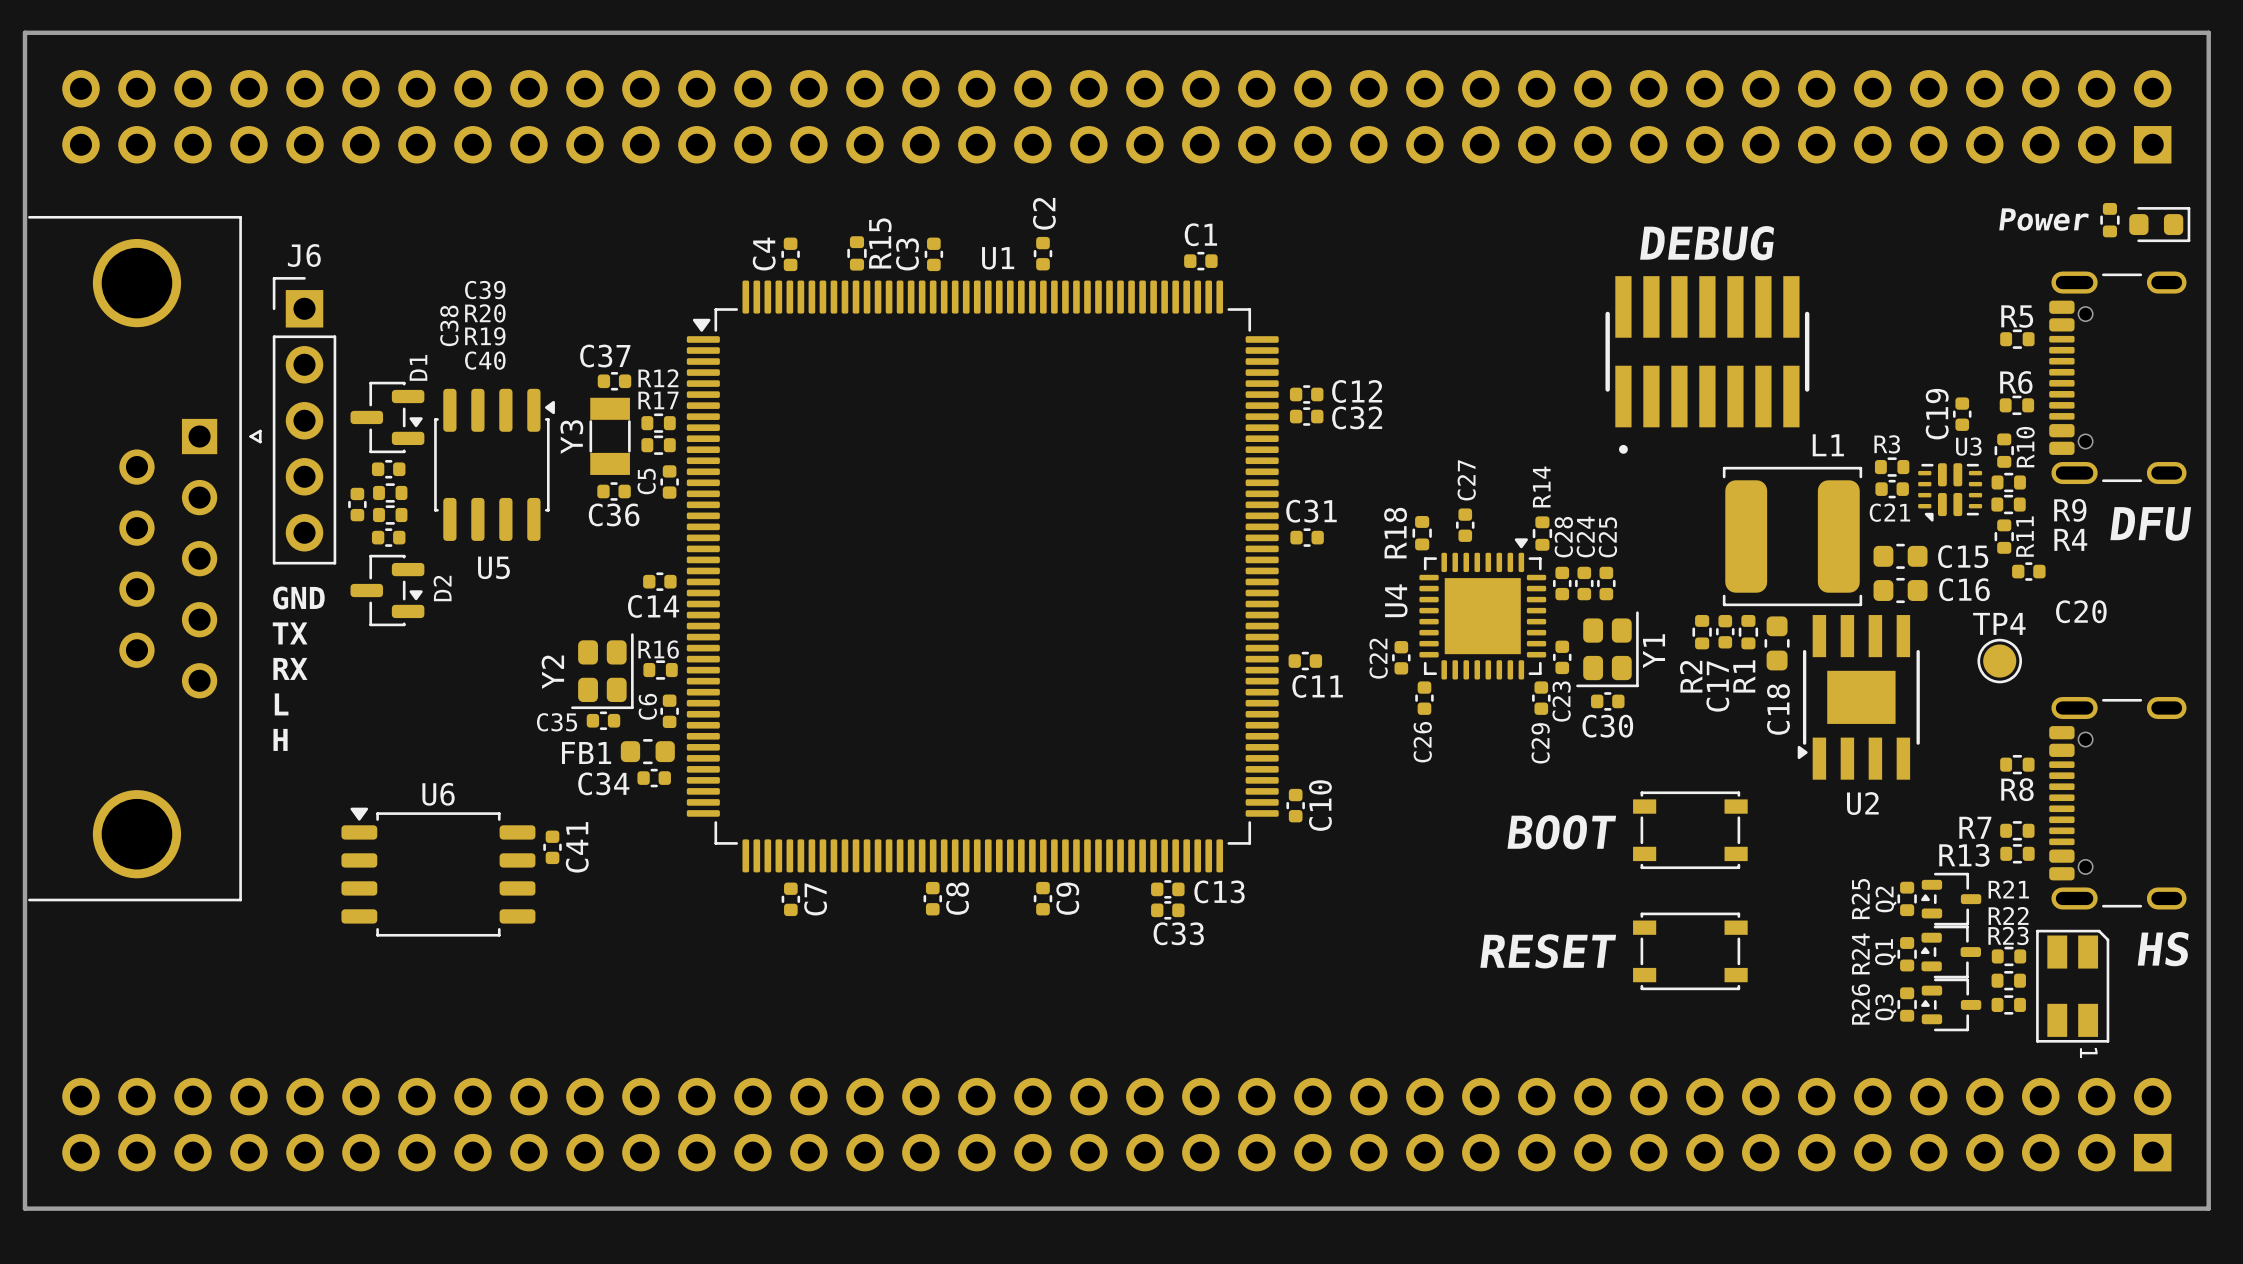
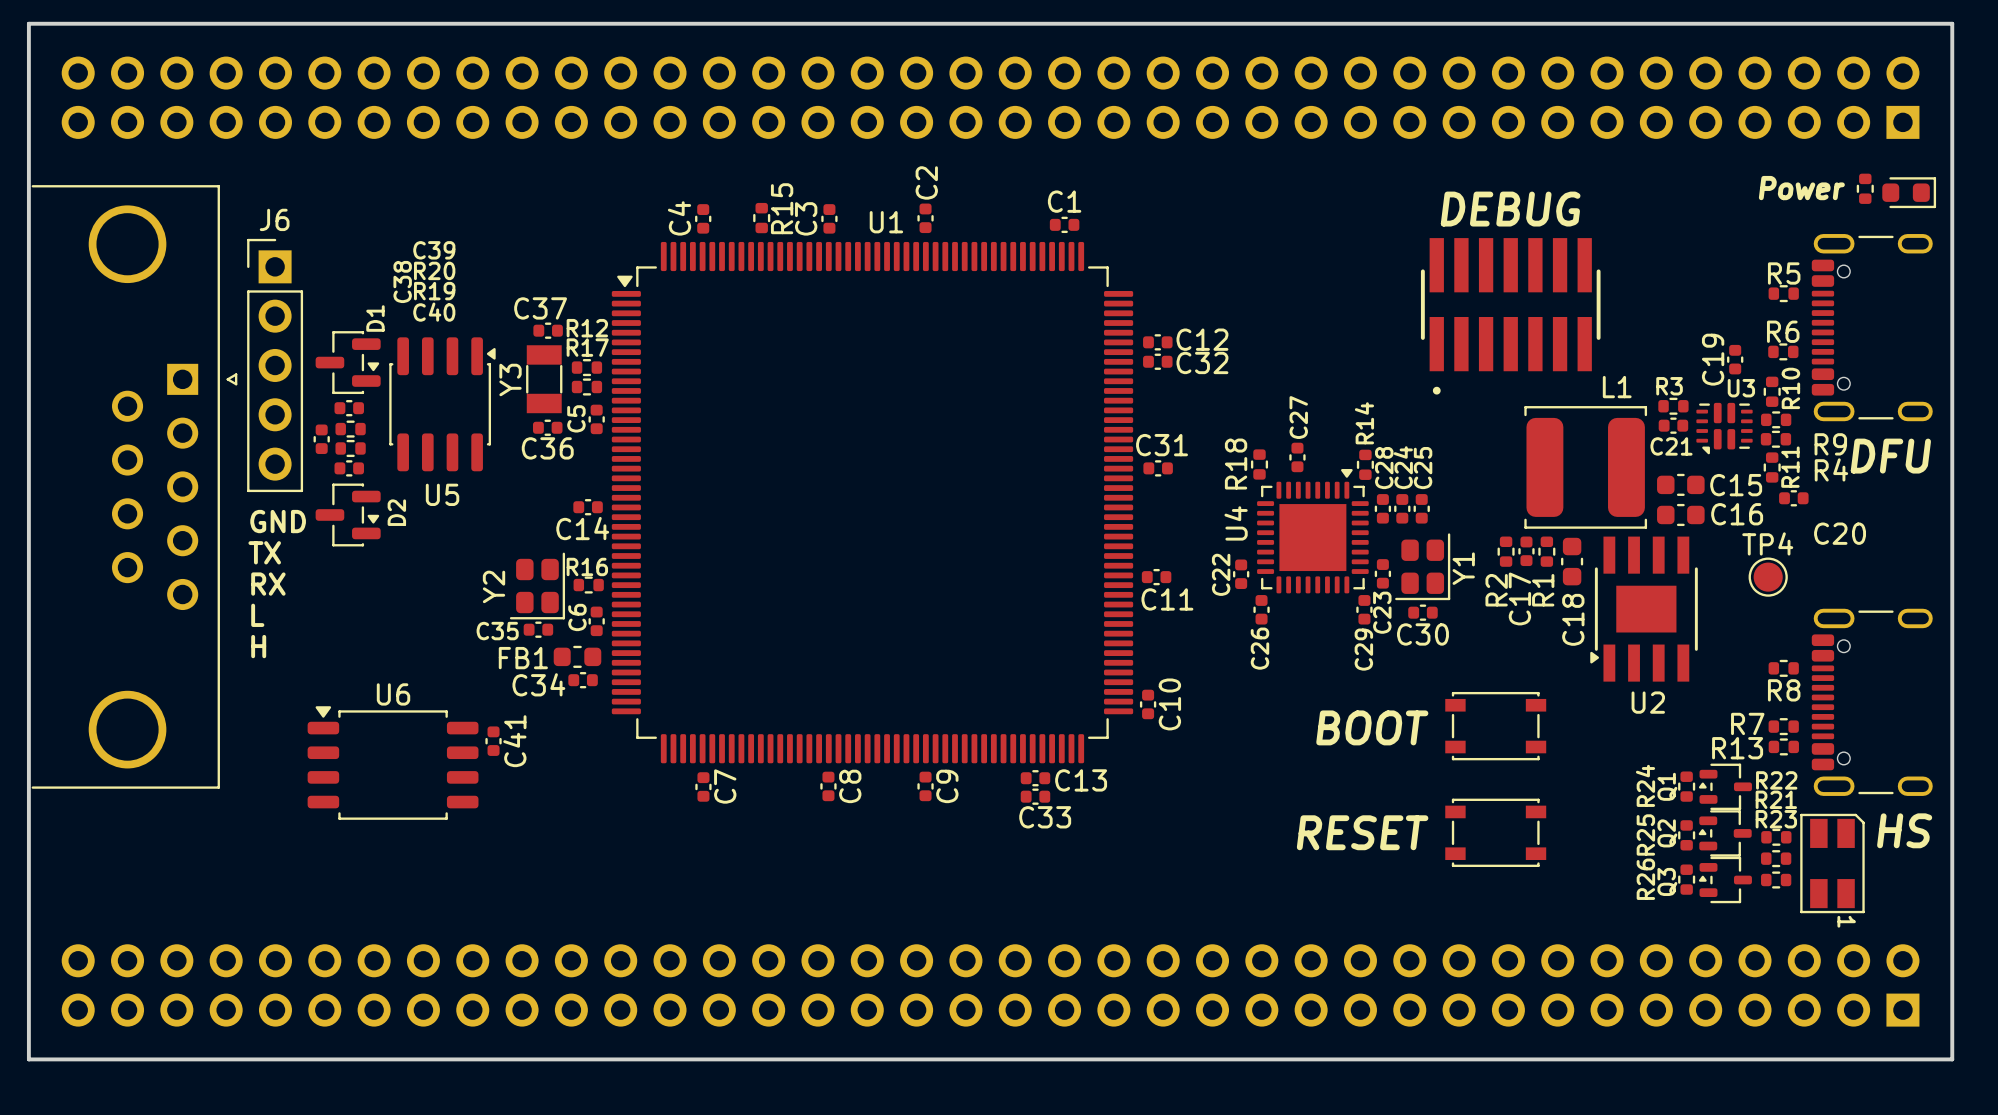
R21 name: R21 (2008, 889) -> R22 (1776, 780)
R25 name: R25 (1860, 899) -> R24 (1645, 785)
Q2 name: Q2 (1886, 899) -> Q1 (1667, 786)
R22 name: R22 (2008, 915) -> R21 (1776, 799)
Q1 name: Q1 (1885, 952) -> Q2 (1667, 833)
R24 name: R24 (1860, 953) -> R25 (1645, 834)

